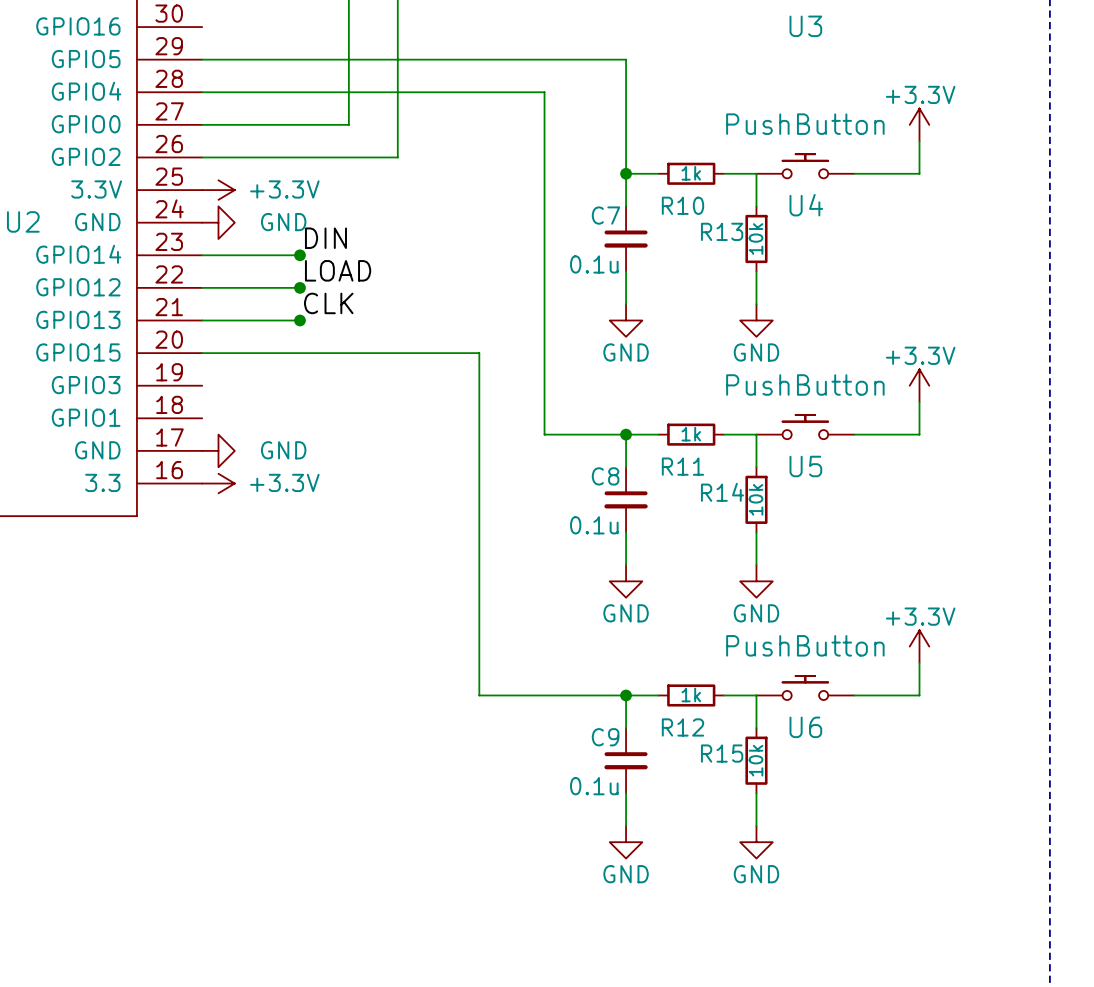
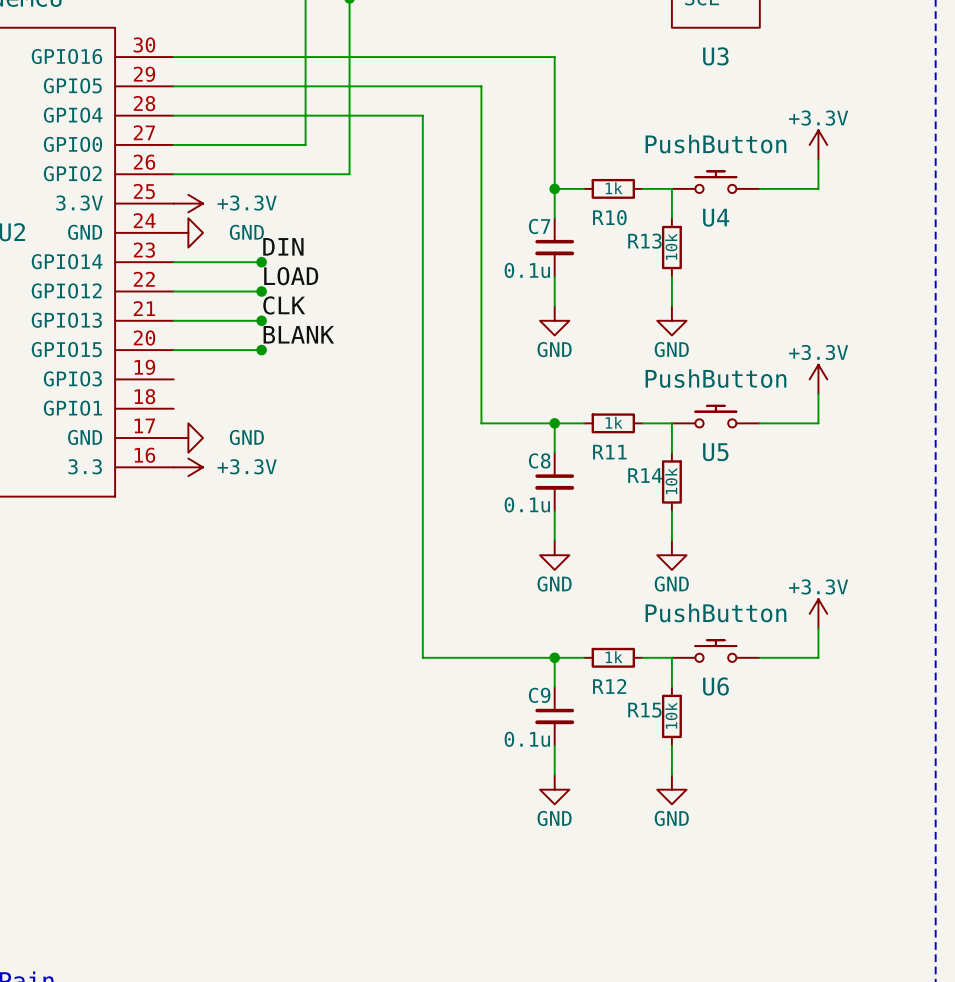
wire: (544, 59) (626, 59) -> (173, 57) (554, 57) (554, 86)
wire: (479, 92) (544, 92) -> (481, 86) (481, 115)
label: none -> BLANK (298, 334)
wire: (299, 353) (479, 353) -> (422, 115) (422, 350)
junction: none -> (261, 350)

